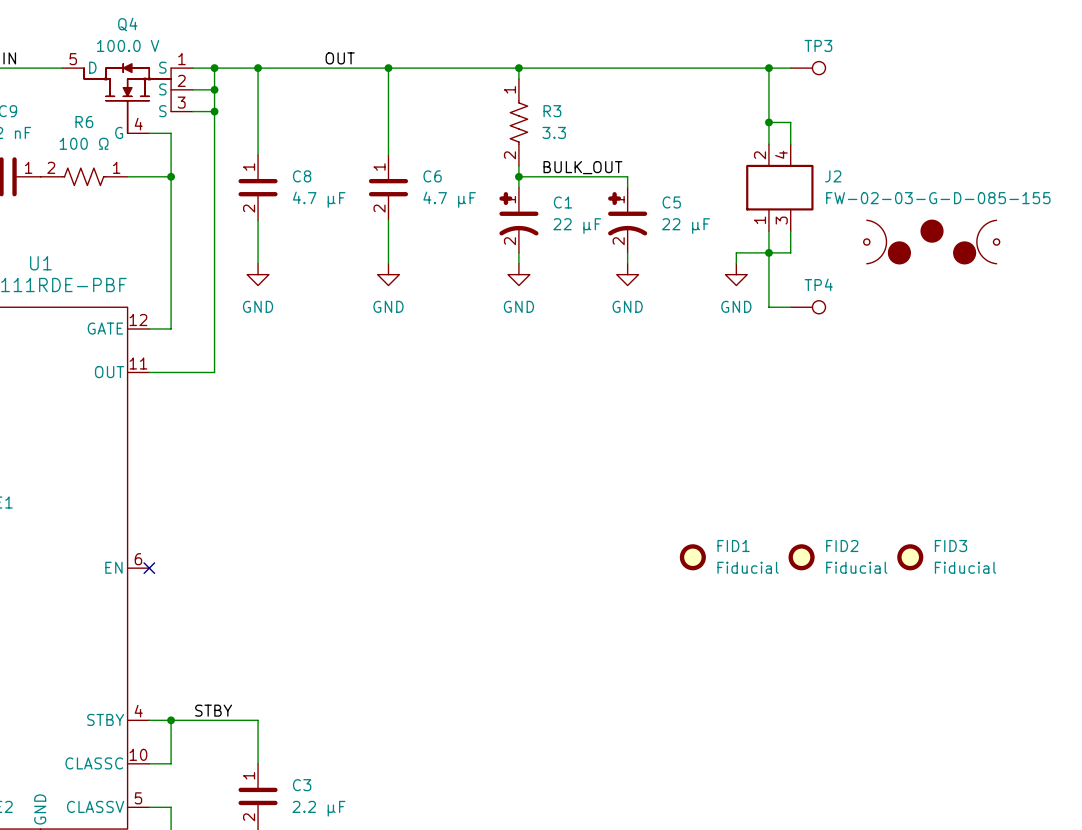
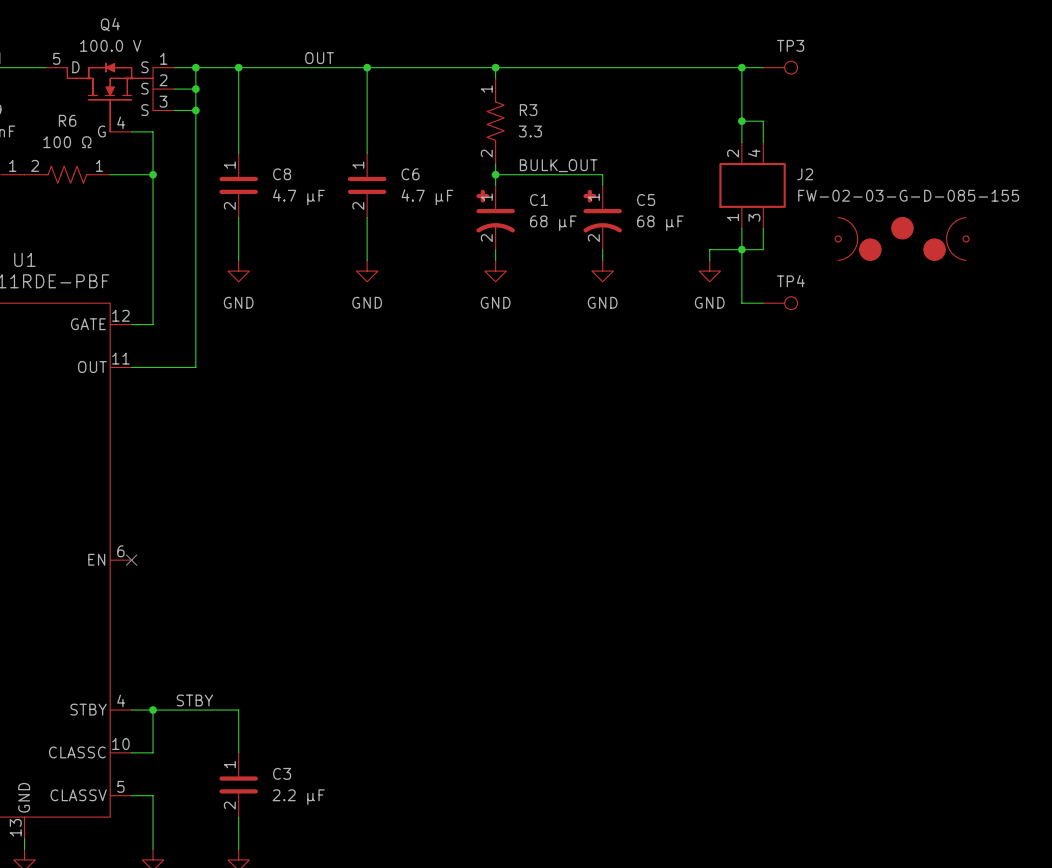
C1 value: 22 µF (577, 226) -> 68 µF (553, 223)
C5 value: 22 µF (685, 226) -> 68 µF (660, 223)
FID1: Fiducial (692, 557) -> none
FID2: Fiducial (801, 557) -> none
FID3: Fiducial (910, 557) -> none

